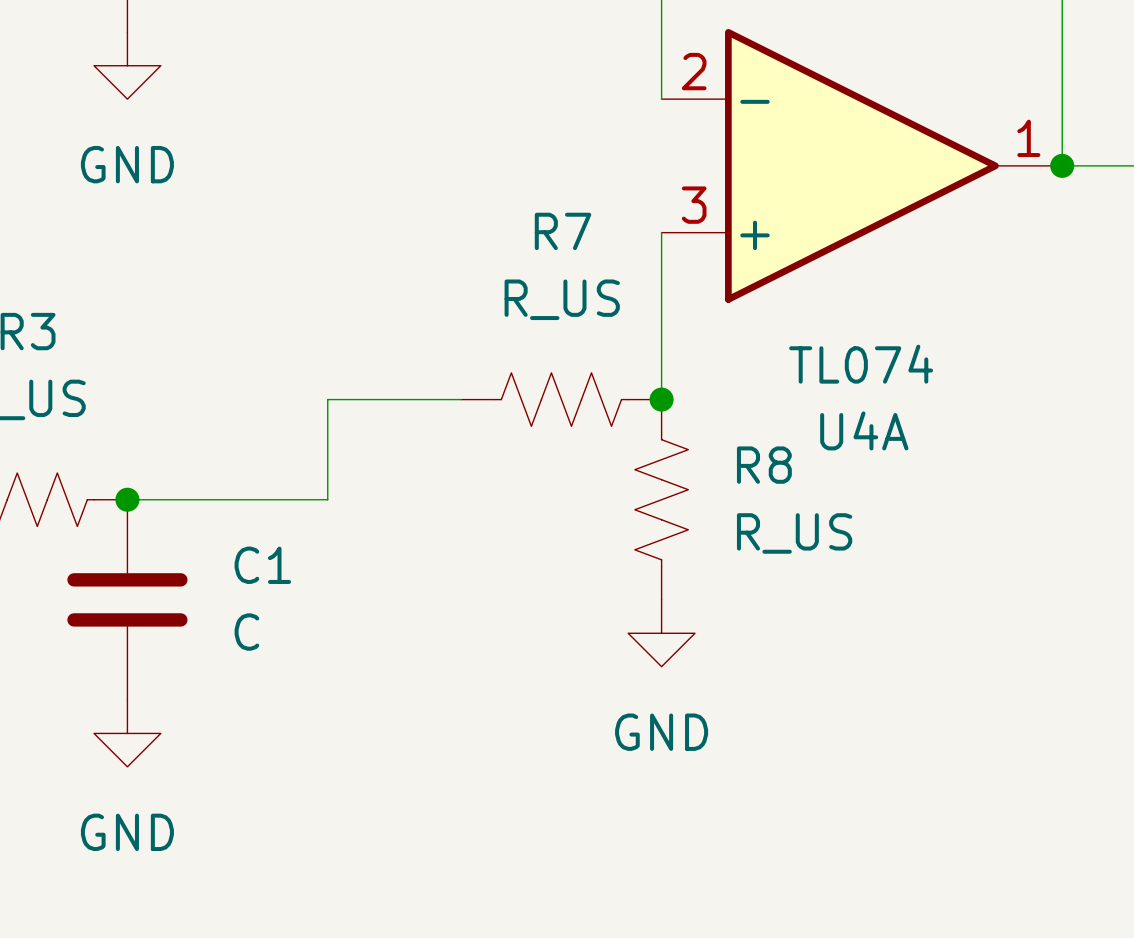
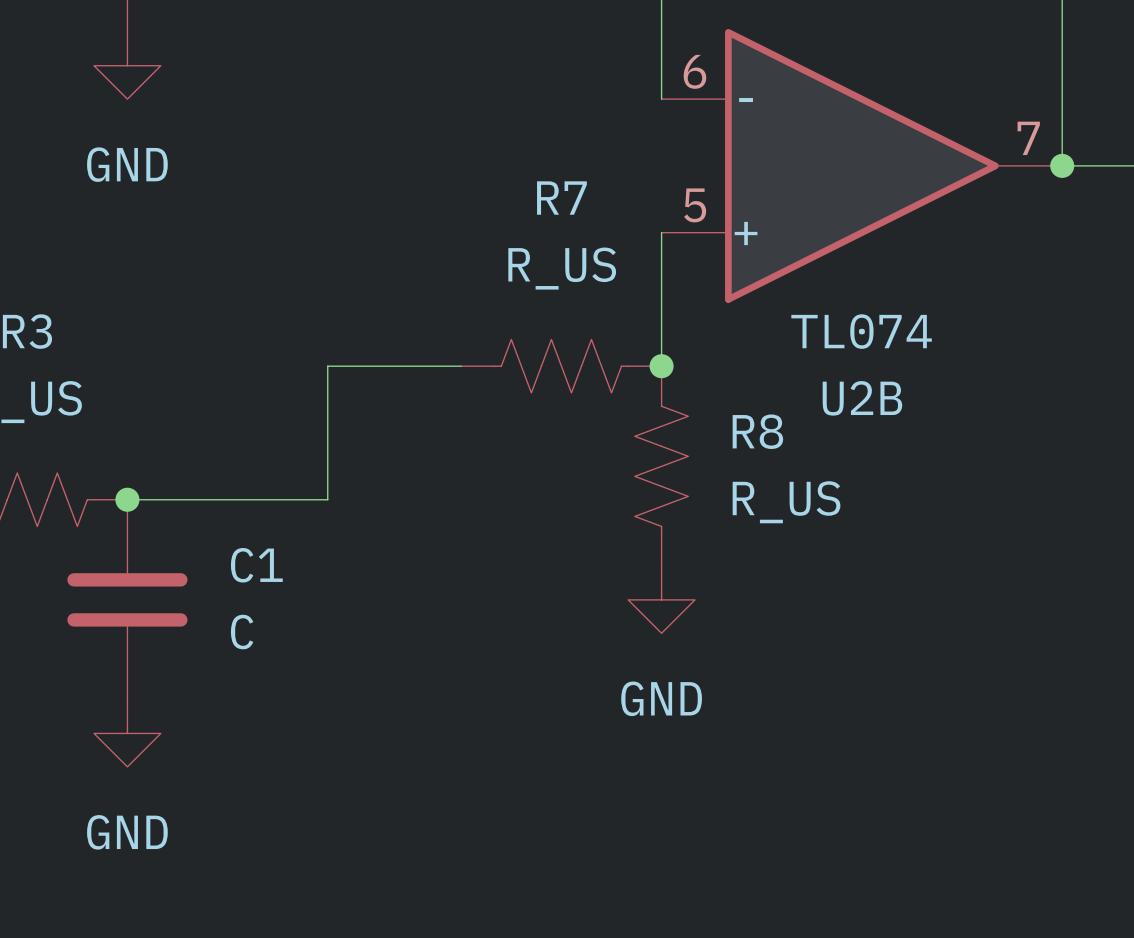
U4A pin number: 2 (694, 71) -> 6 (694, 71)
U4A pin number: 1 (1028, 138) -> 7 (1028, 138)
U4A pin number: 3 (694, 205) -> 5 (695, 205)
U4A value position: TL074 (861, 364) -> TL074 (861, 331)
wire: (327, 399) (461, 399) -> (327, 399) (327, 366) (461, 366)
R7 position: (561, 399) -> (561, 366)
junction position: (661, 399) -> (661, 366)
U4A name: U4A (864, 430) -> U2B (862, 398)
R8 position: (661, 499) -> (661, 466)
power symbol position: GND (661, 633) -> GND (661, 599)

